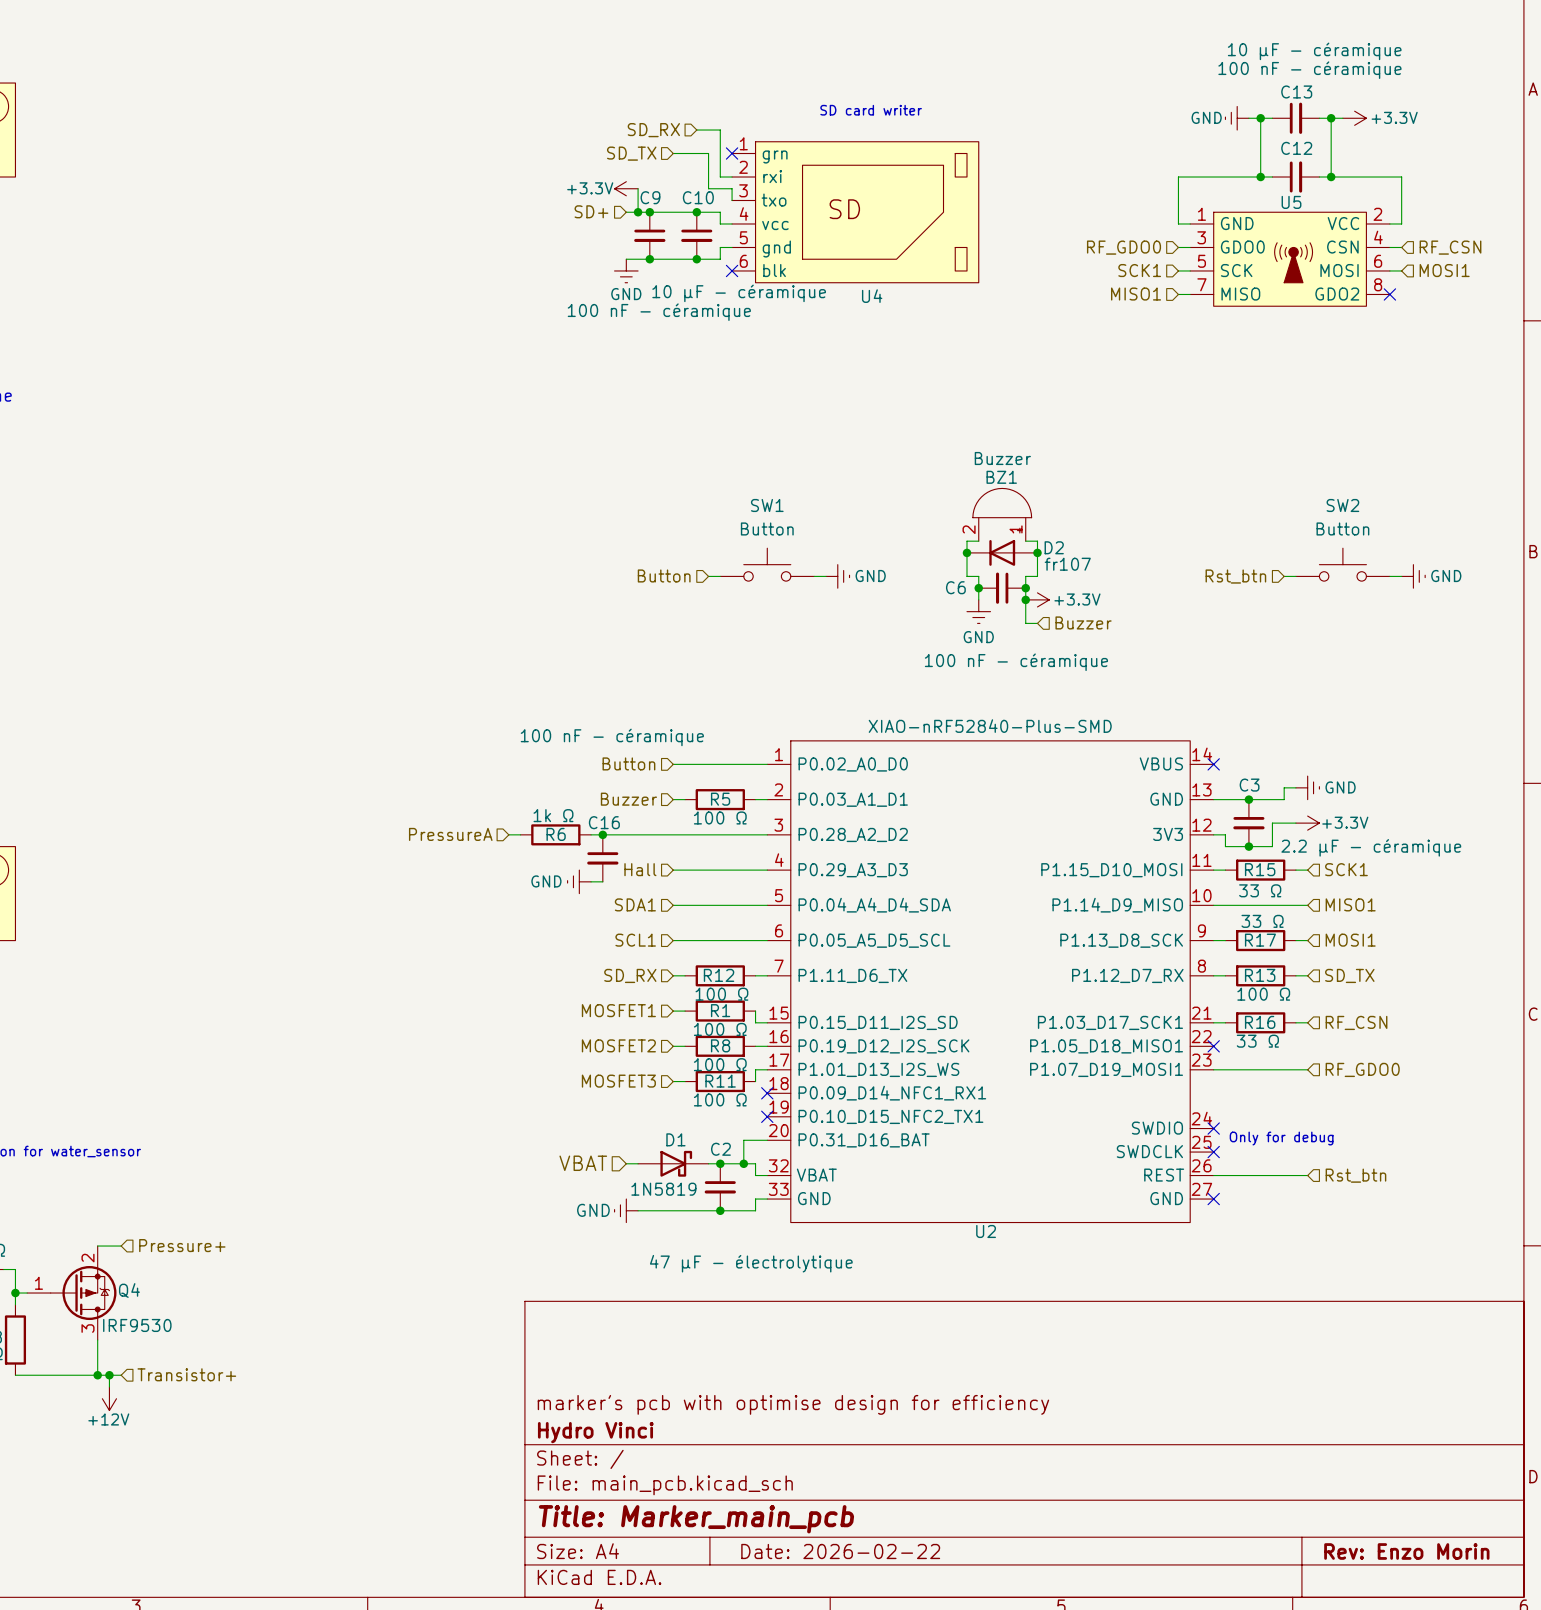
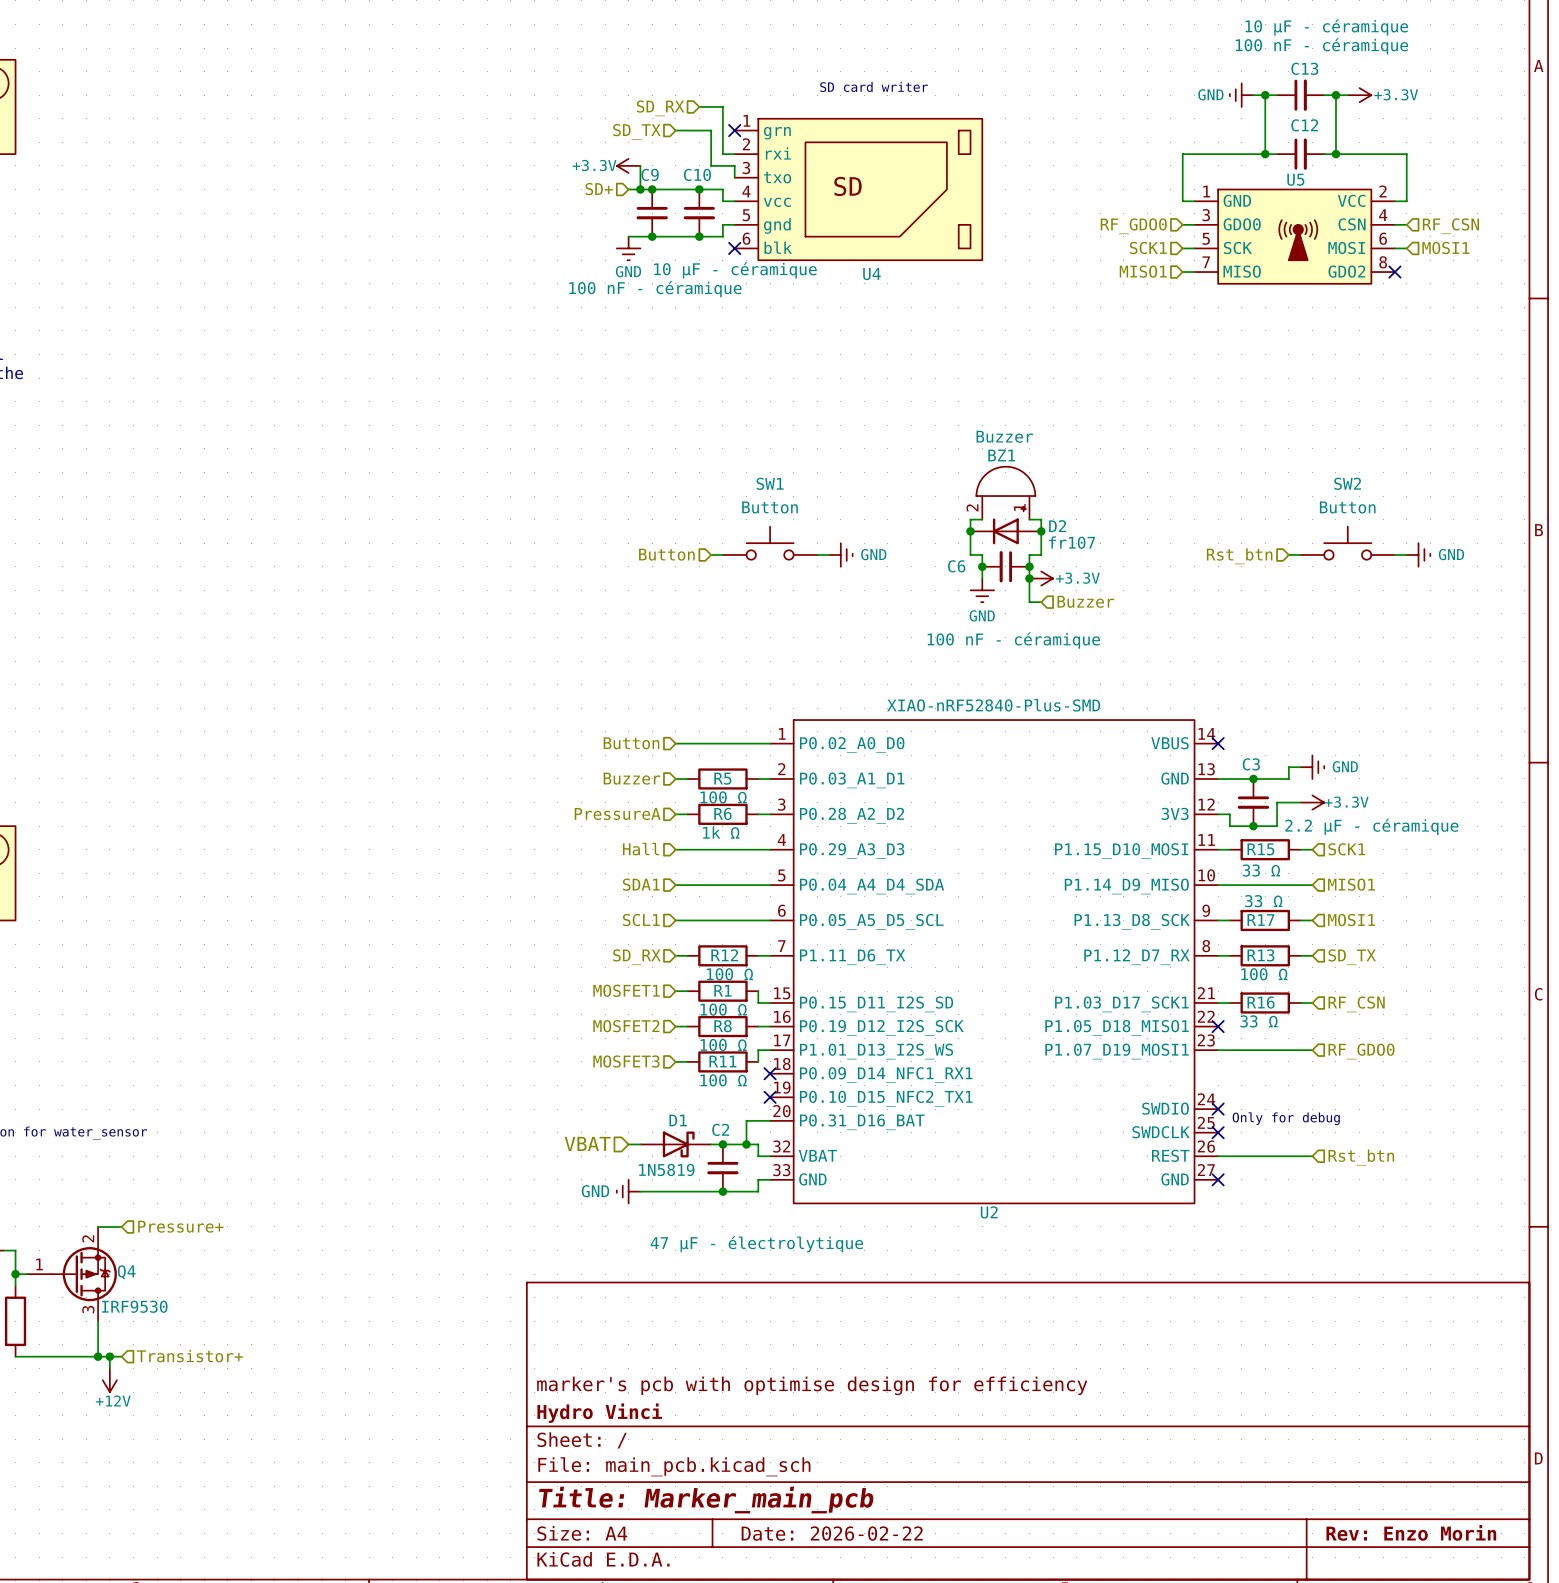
R6 value position: 1k Ω (553, 815) -> 1k Ω (721, 832)
hierarchical label position: PressureA (450, 834) -> PressureA (617, 814)
wire: (508, 834) (520, 834) -> none
R6 position: (555, 834) -> (722, 814)
wire: (591, 834) (673, 834) -> none
junction: (602, 834) -> none
wire: (685, 834) (755, 834) -> none
C16: 100 nF - céramique (602, 858) -> none
power symbol: GND (579, 881) -> none
wire: (591, 881) (602, 881) -> none

